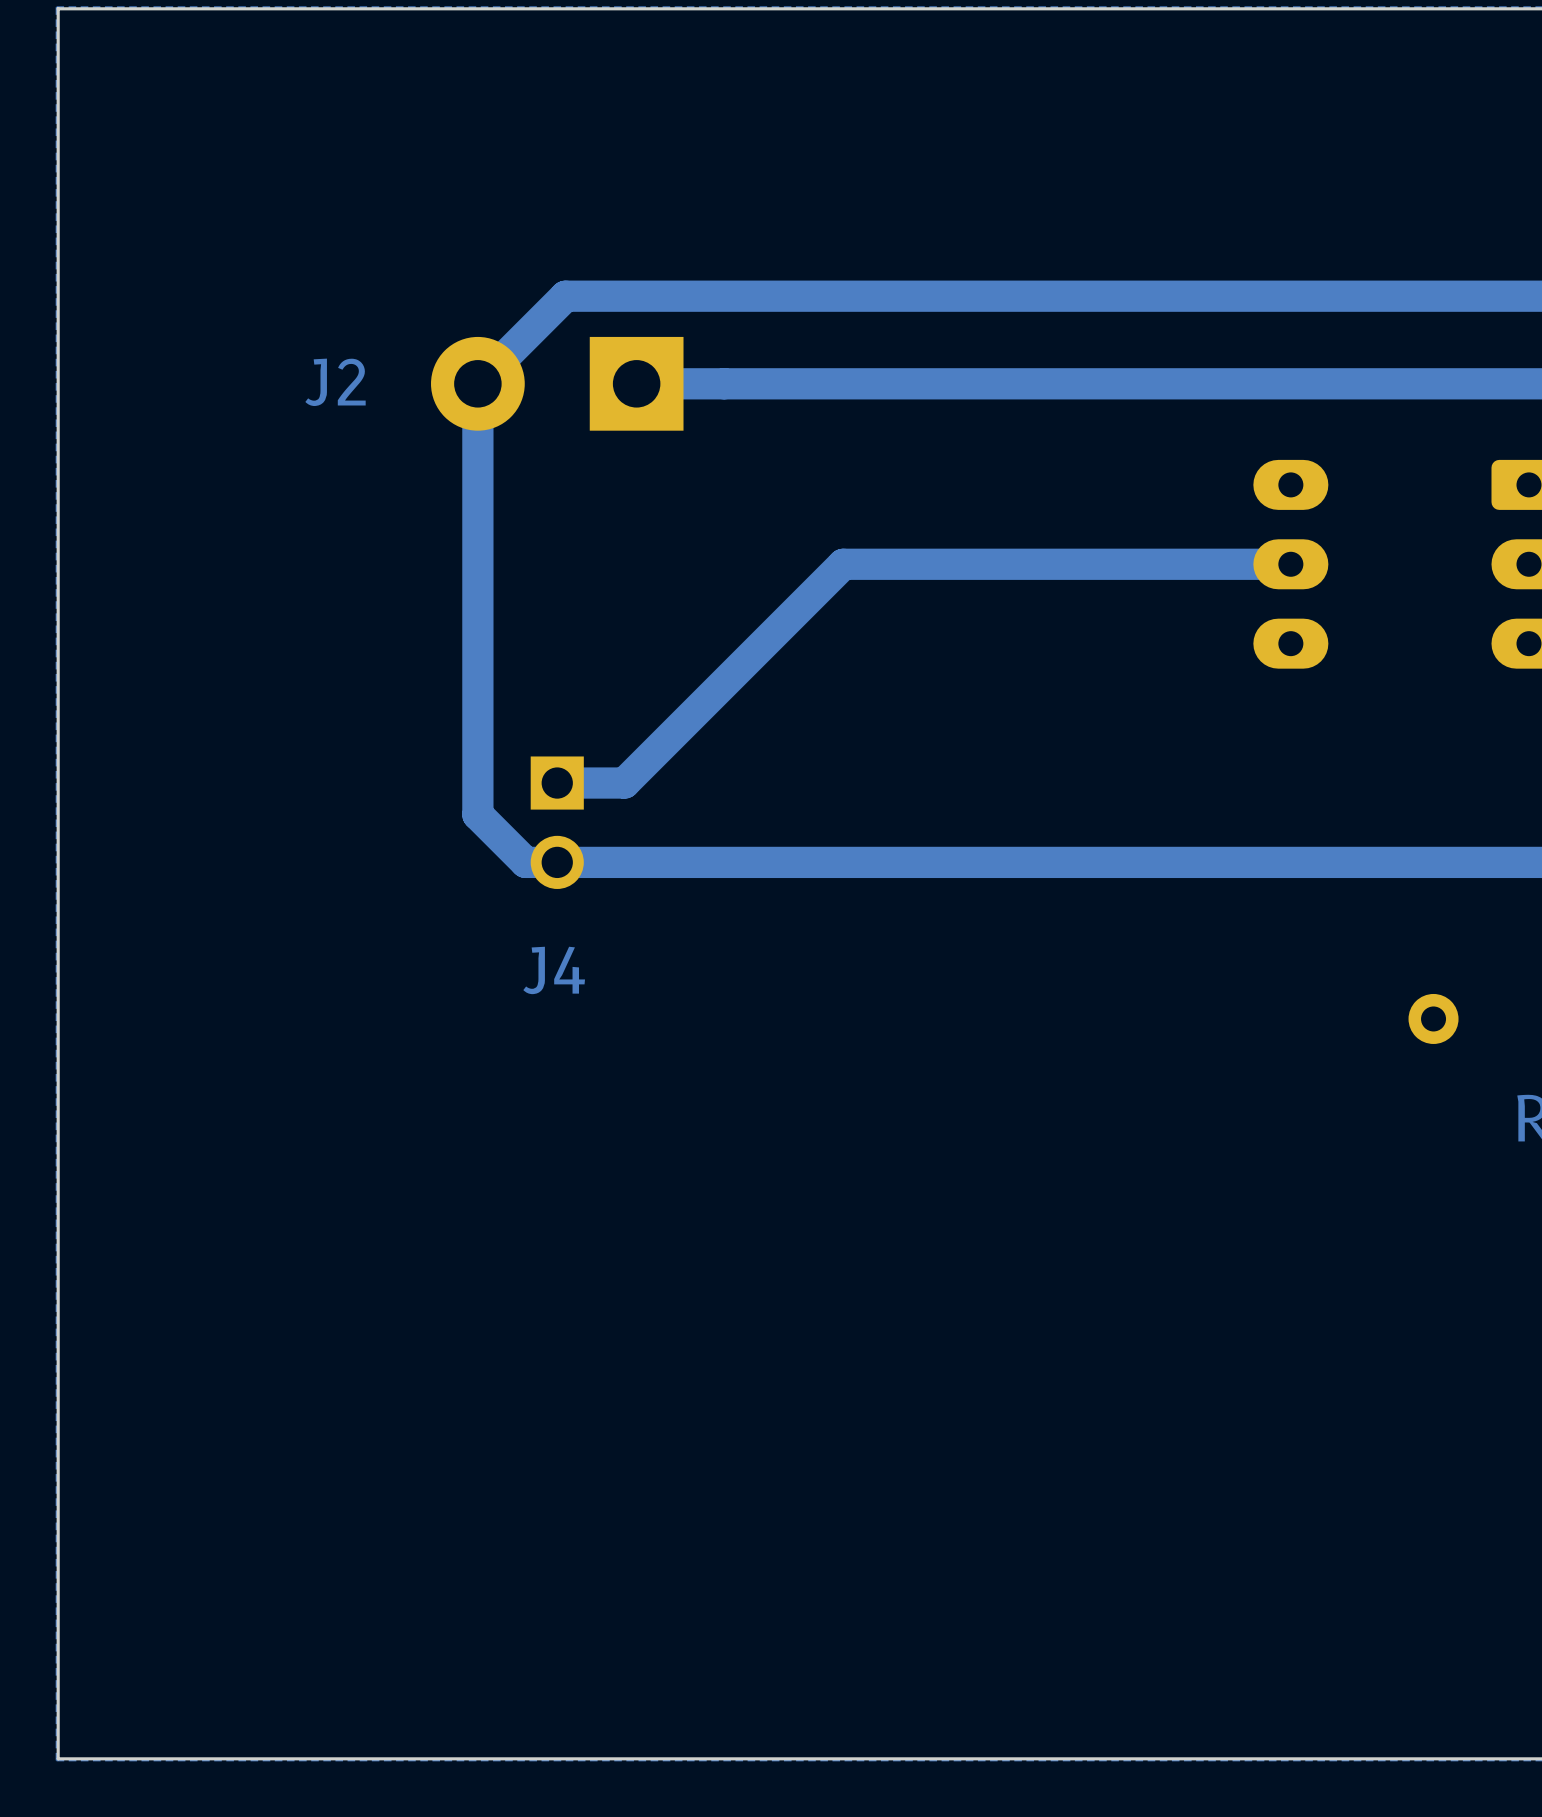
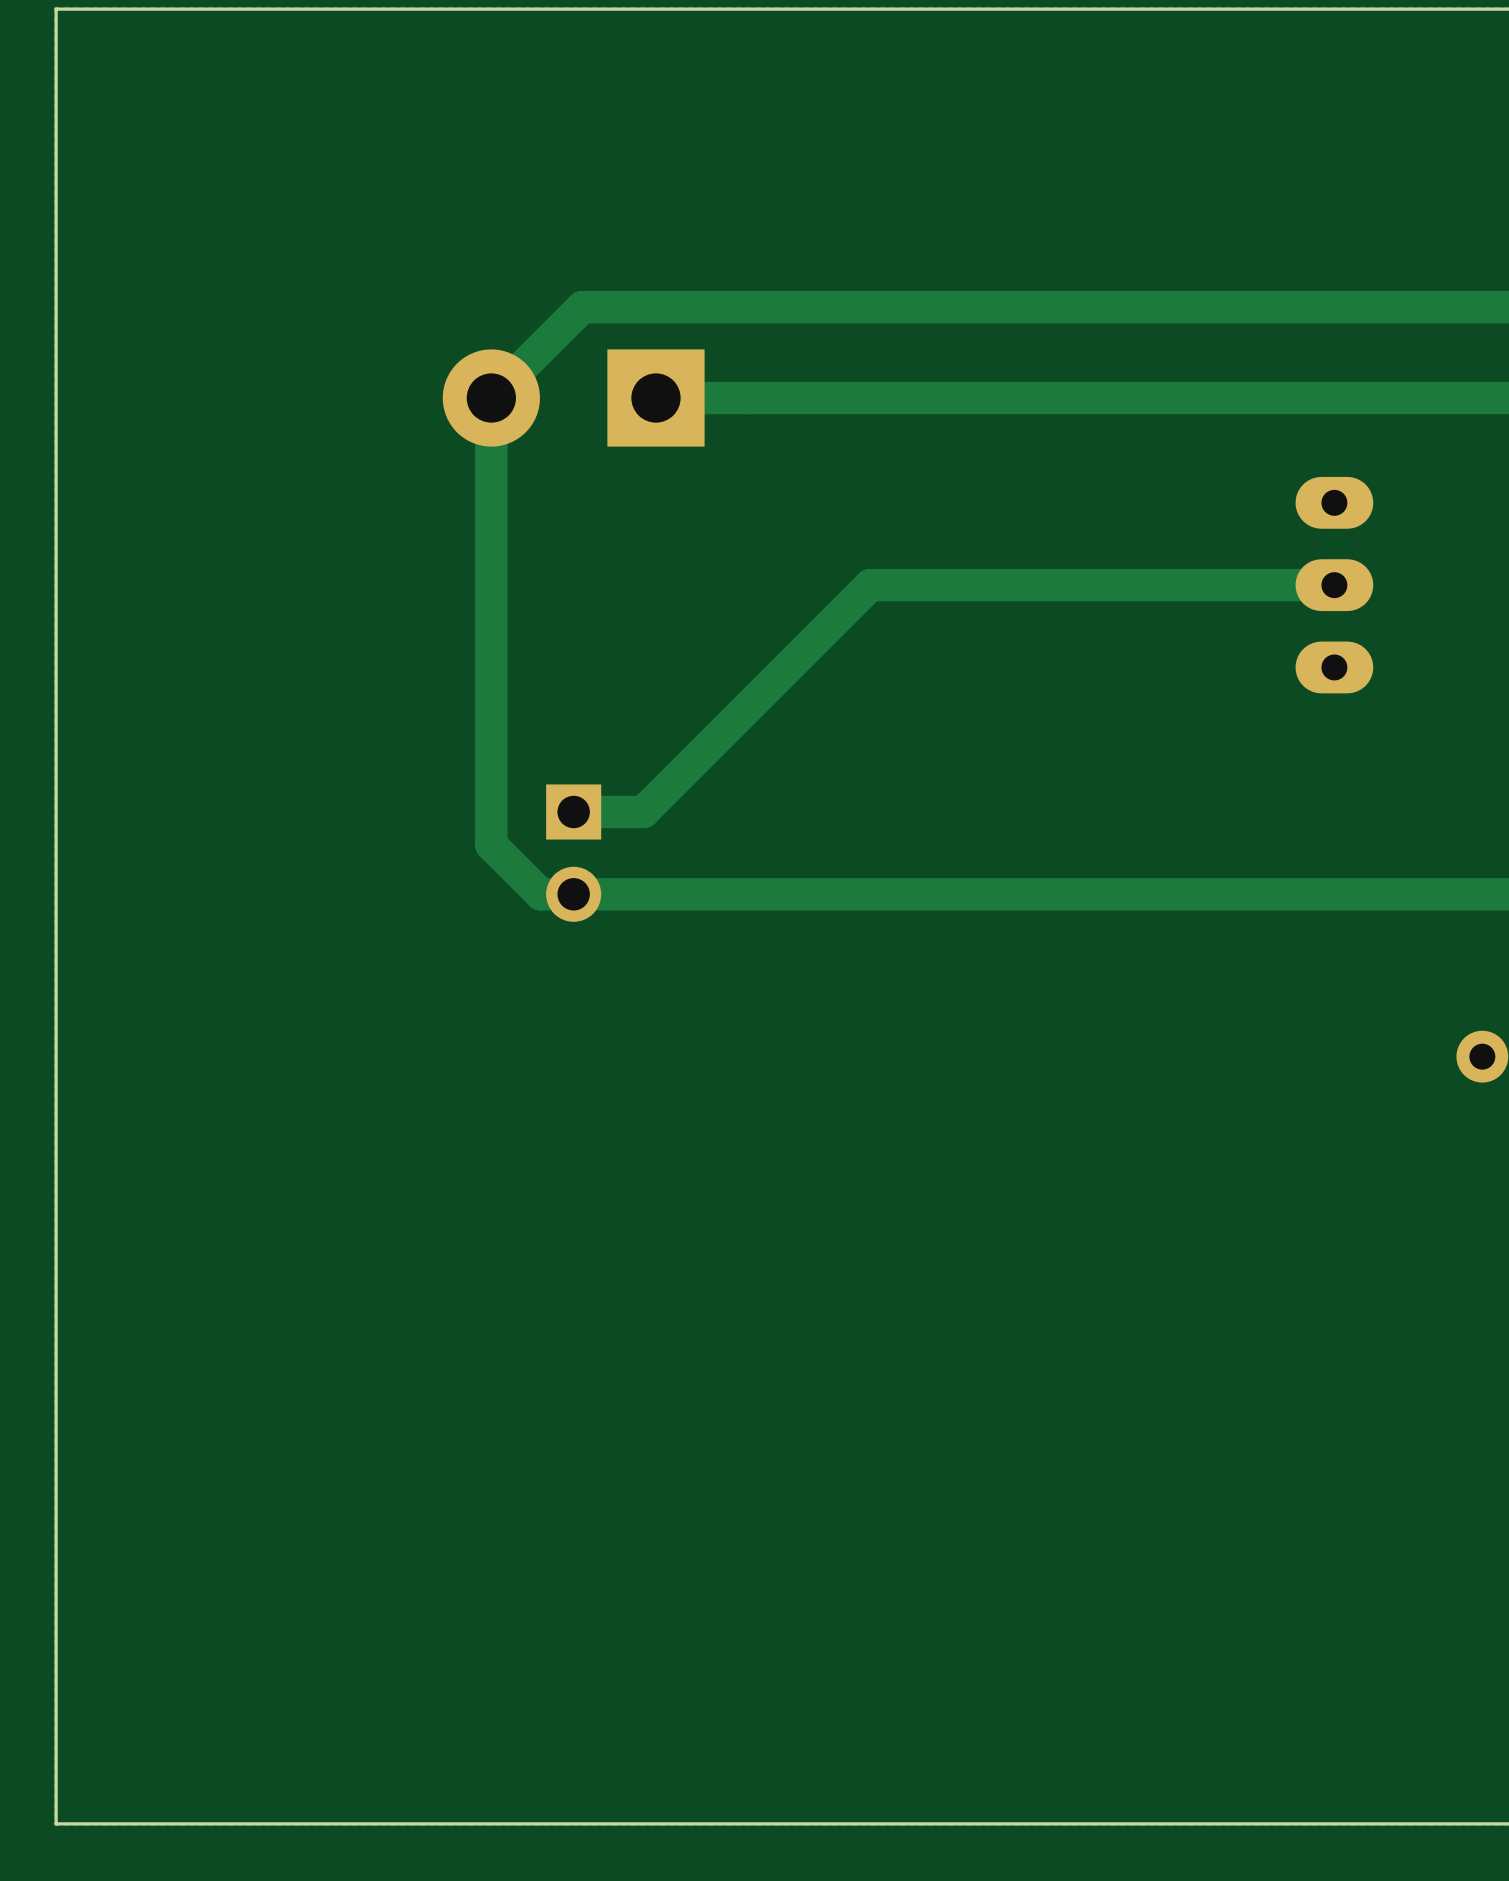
text: J2 (335, 382) -> none
text: J4 (554, 970) -> none

